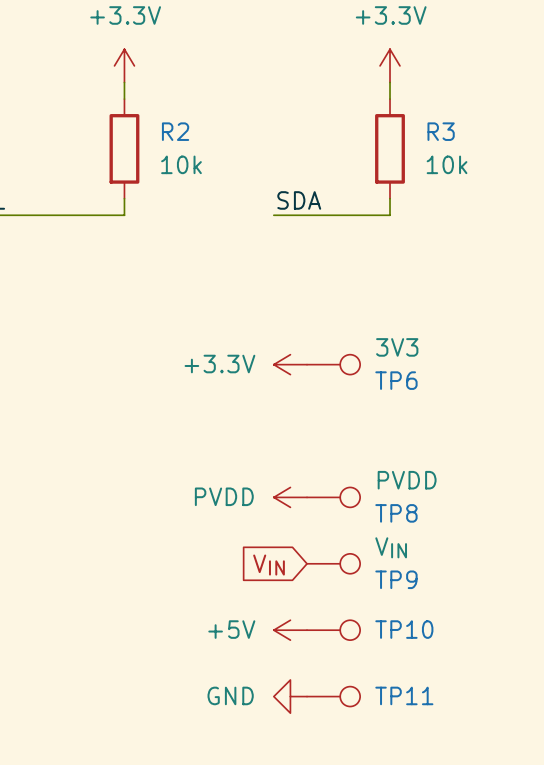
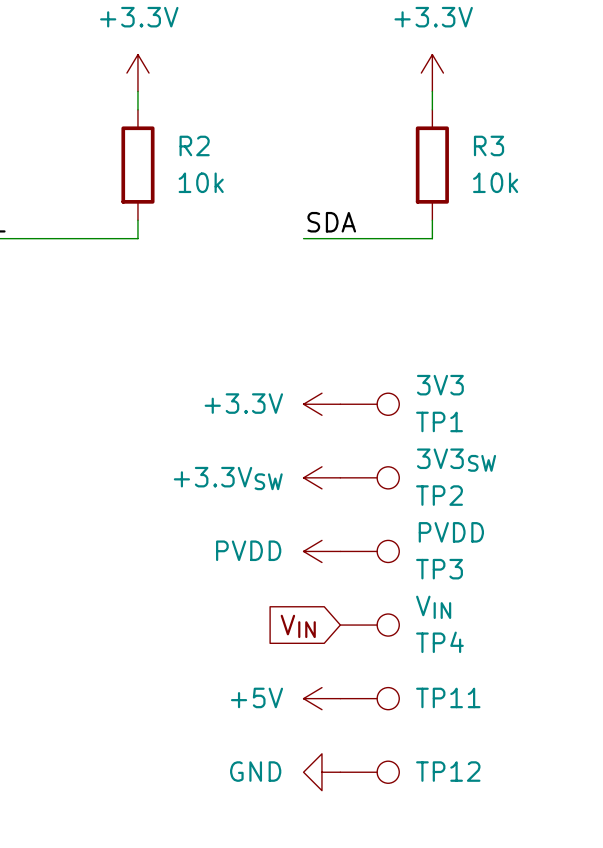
TP6 name: TP6 (396, 380) -> TP1 (439, 421)
power symbol: none -> +3.3VSW (321, 477)
TP2: none -> 3V3SW (369, 477)
TP8 name: TP8 (396, 513) -> TP3 (439, 569)
TP9 name: TP9 (396, 579) -> TP4 (439, 642)
TP10 name: TP10 (404, 629) -> TP11 (448, 697)
TP11 name: TP11 (404, 695) -> TP12 (448, 771)

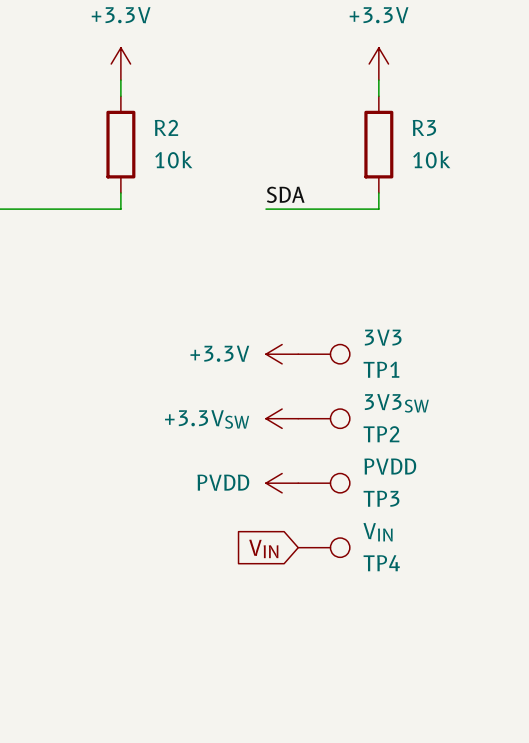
power symbol: +5V (321, 698) -> none
TP11: (369, 698) -> none
power symbol: GND (321, 772) -> none
TP12: (369, 772) -> none

